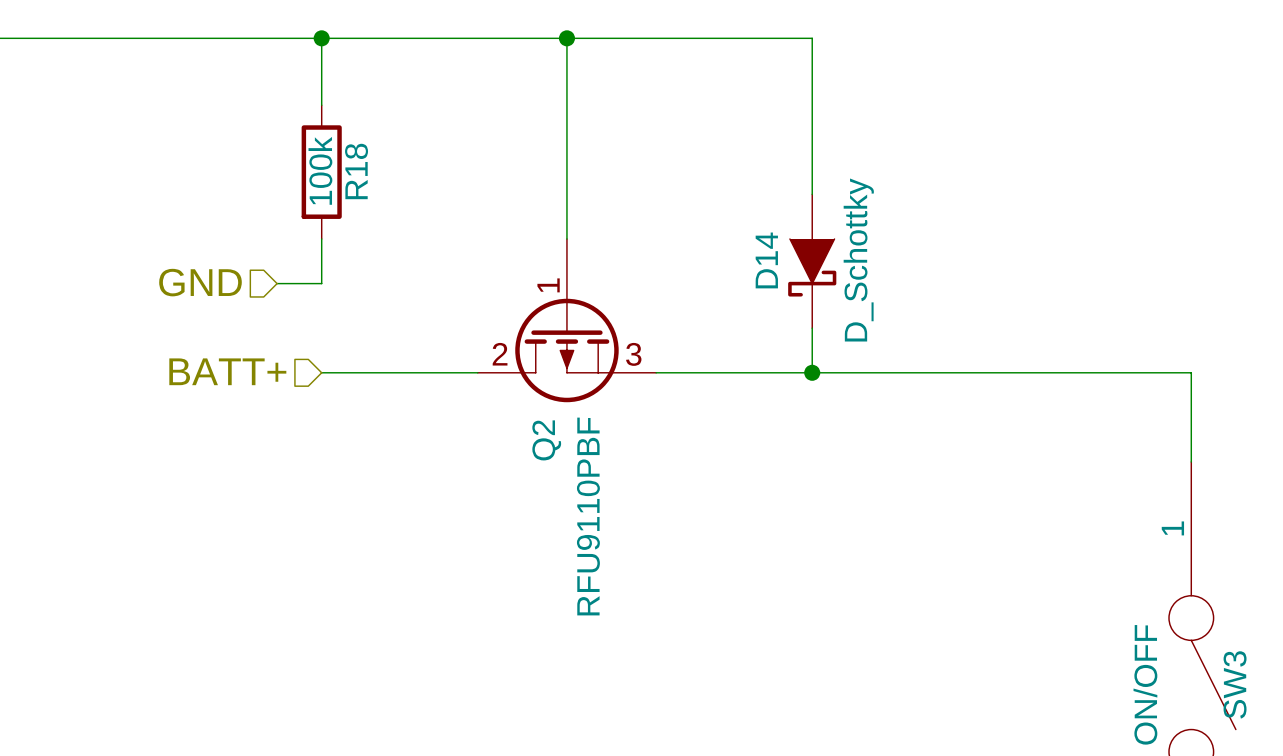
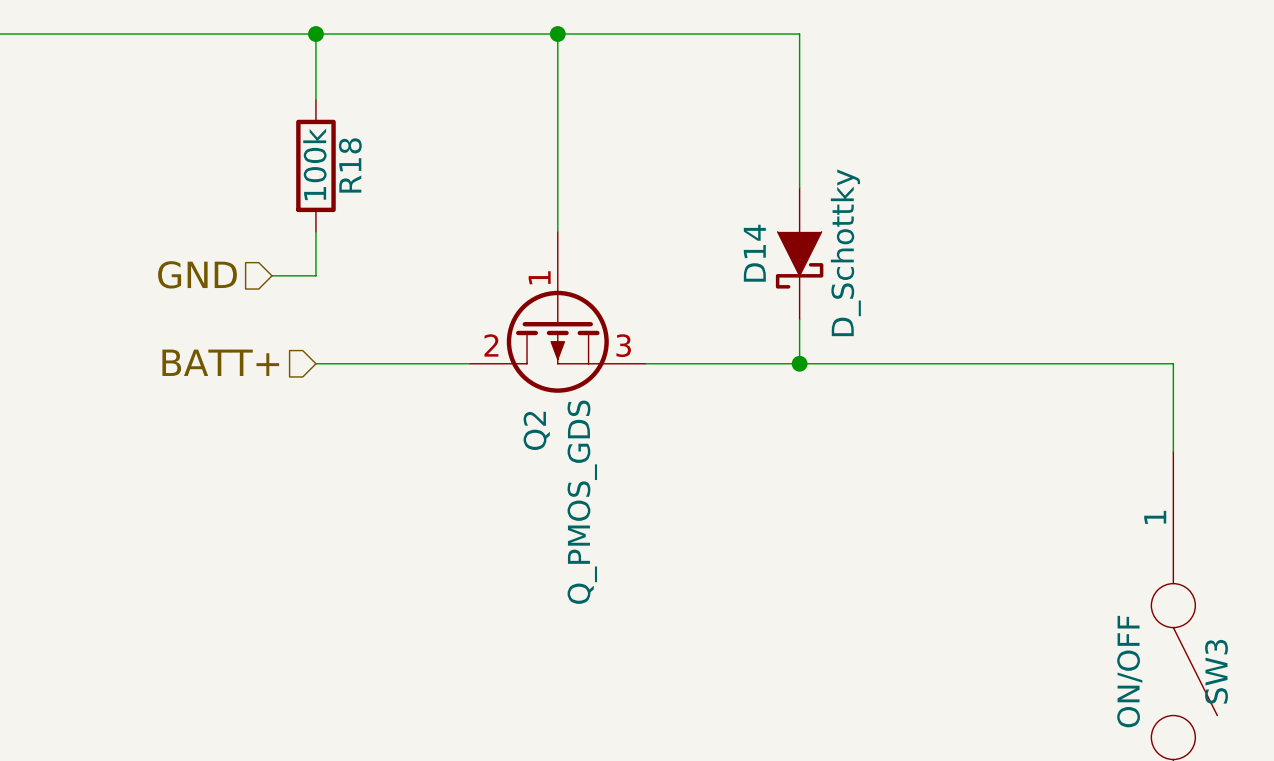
Q2 value: RFU9110PBF (588, 516) -> Q_PMOS_GDS (582, 502)

